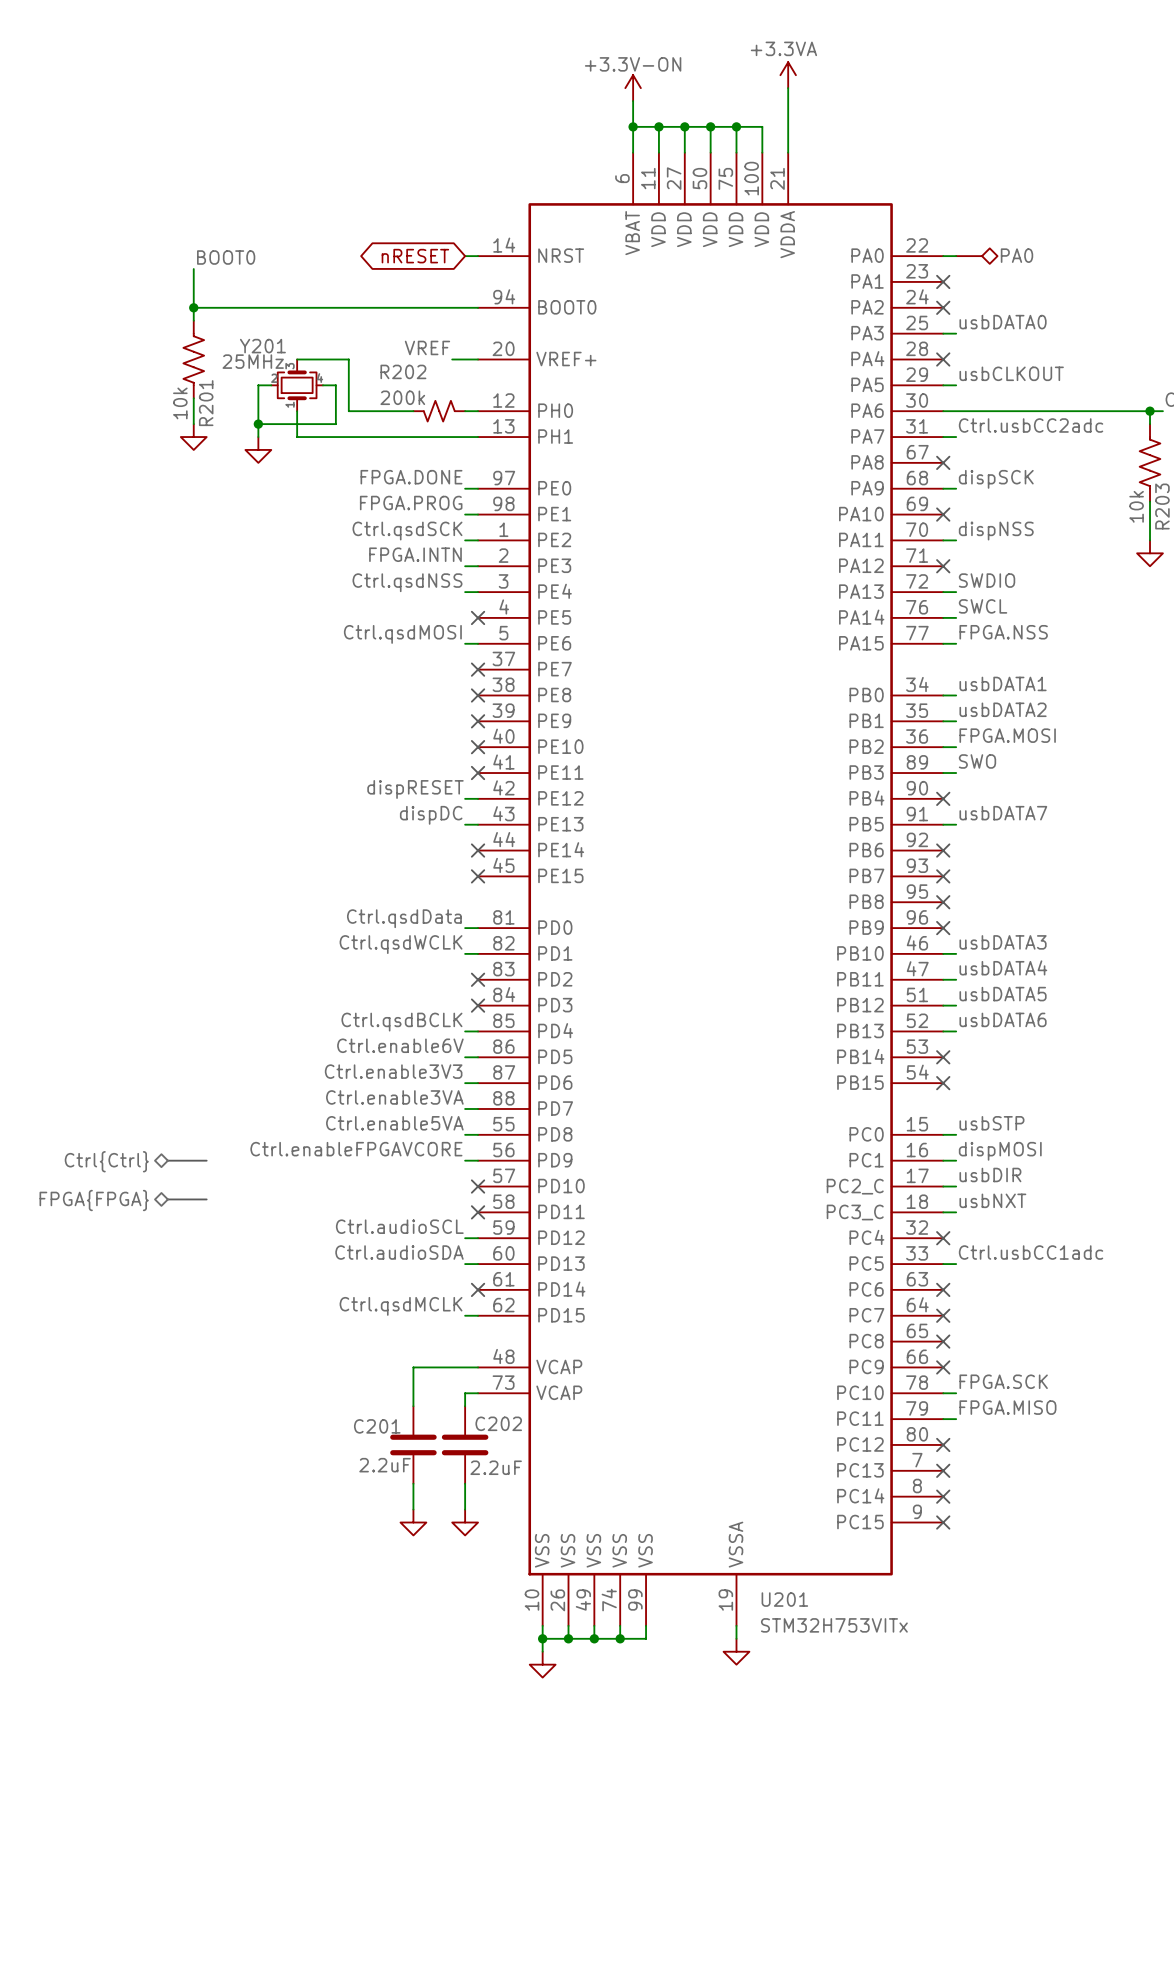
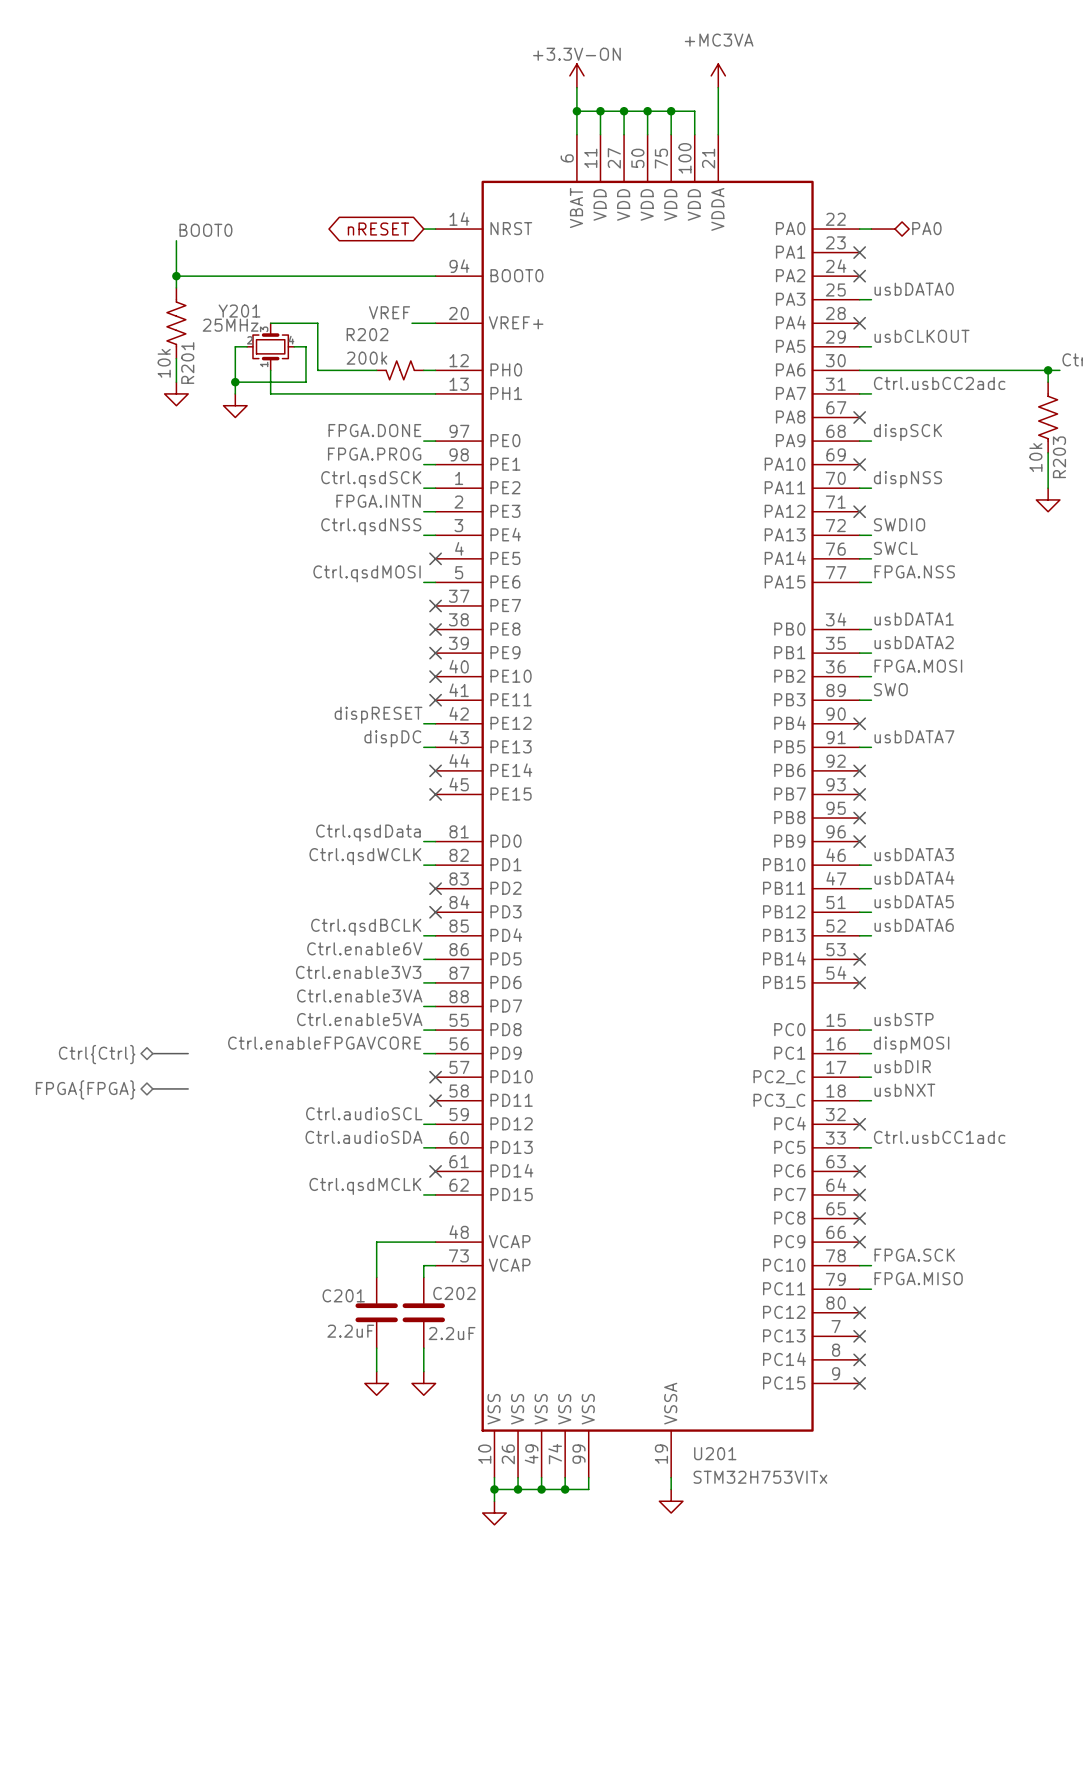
power symbol: +3.3VA (788, 75) -> none
power symbol: none -> +MC3VA (718, 75)

